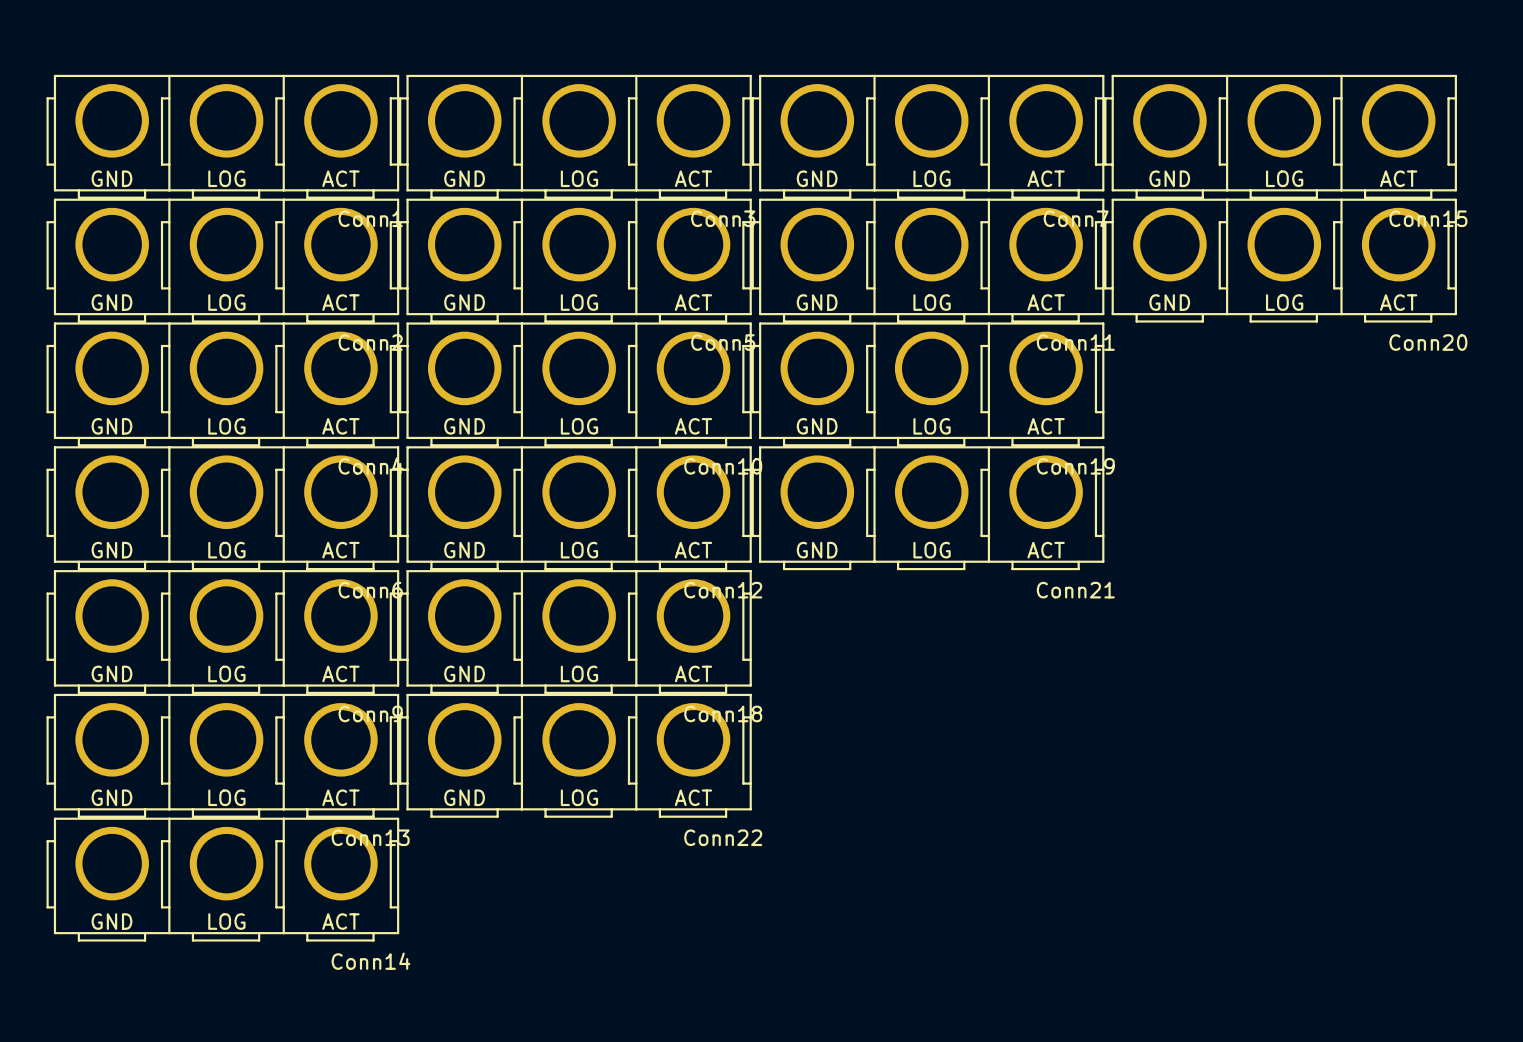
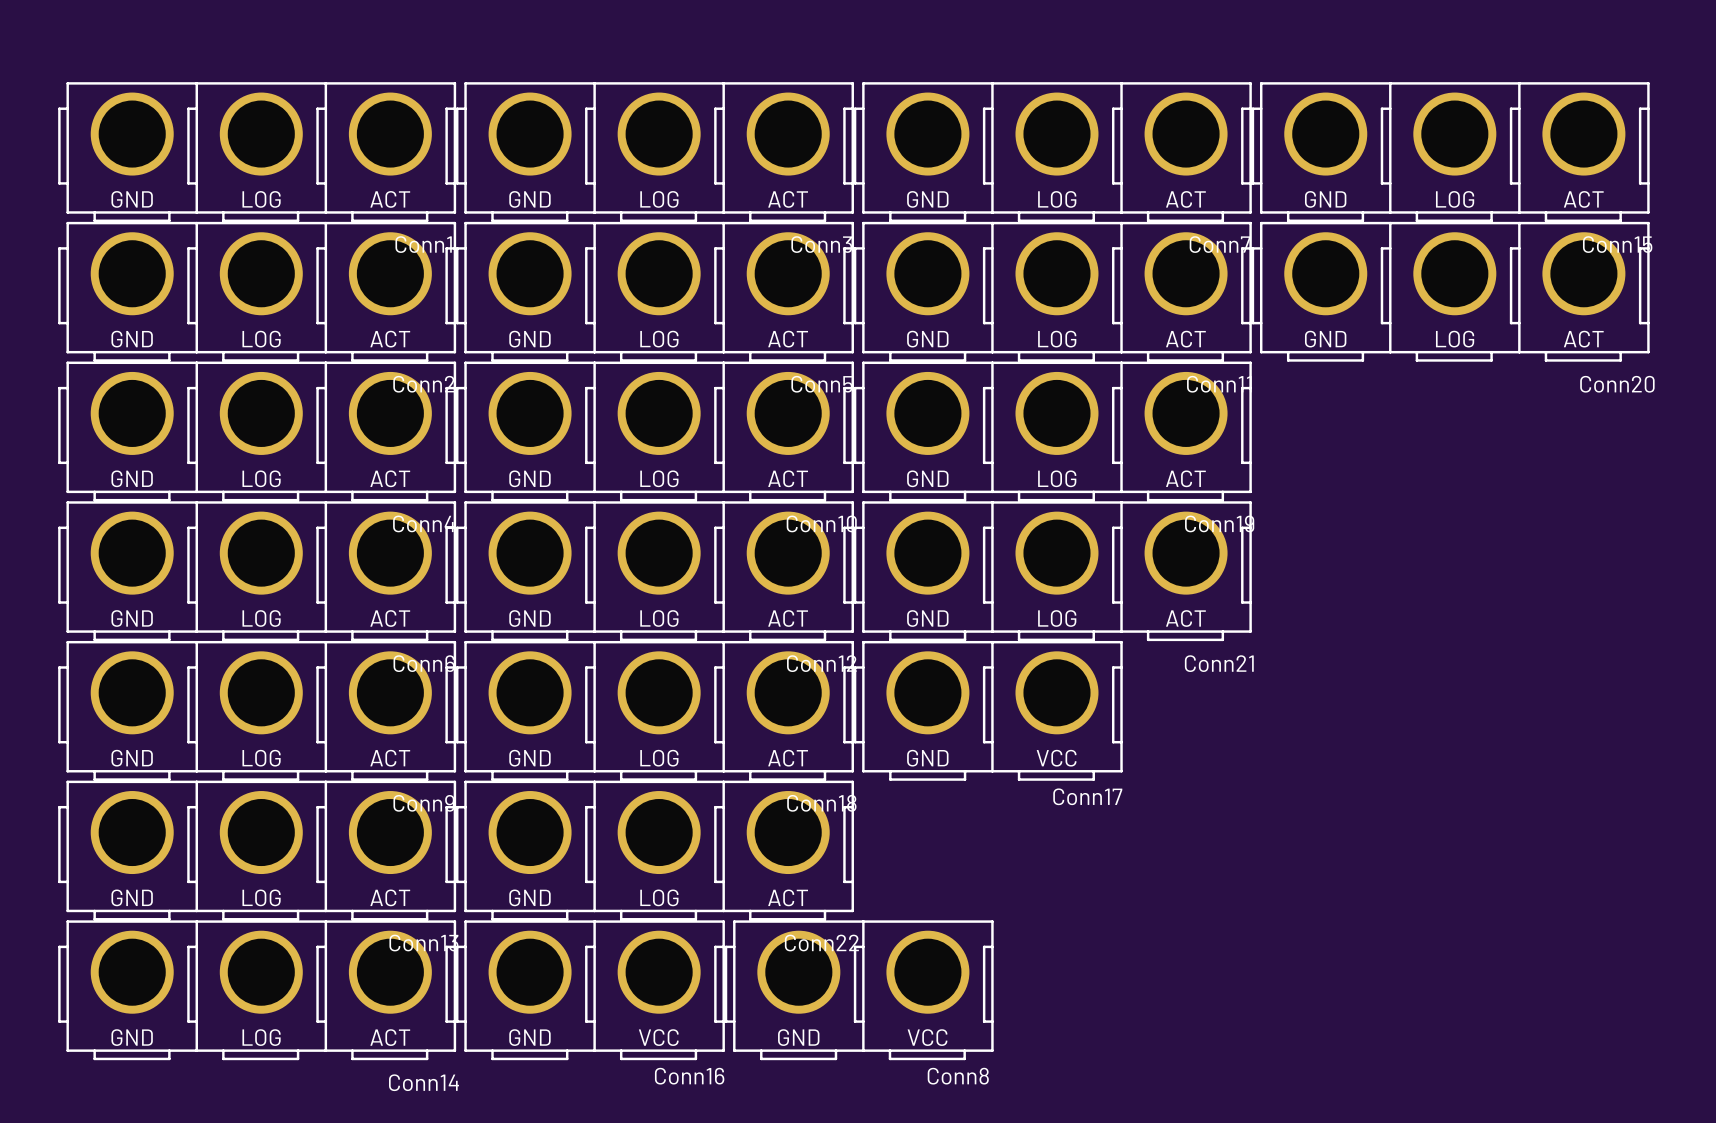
Conn17: none -> (988, 710)
Conn16: none -> (590, 990)
Conn8: none -> (859, 990)

